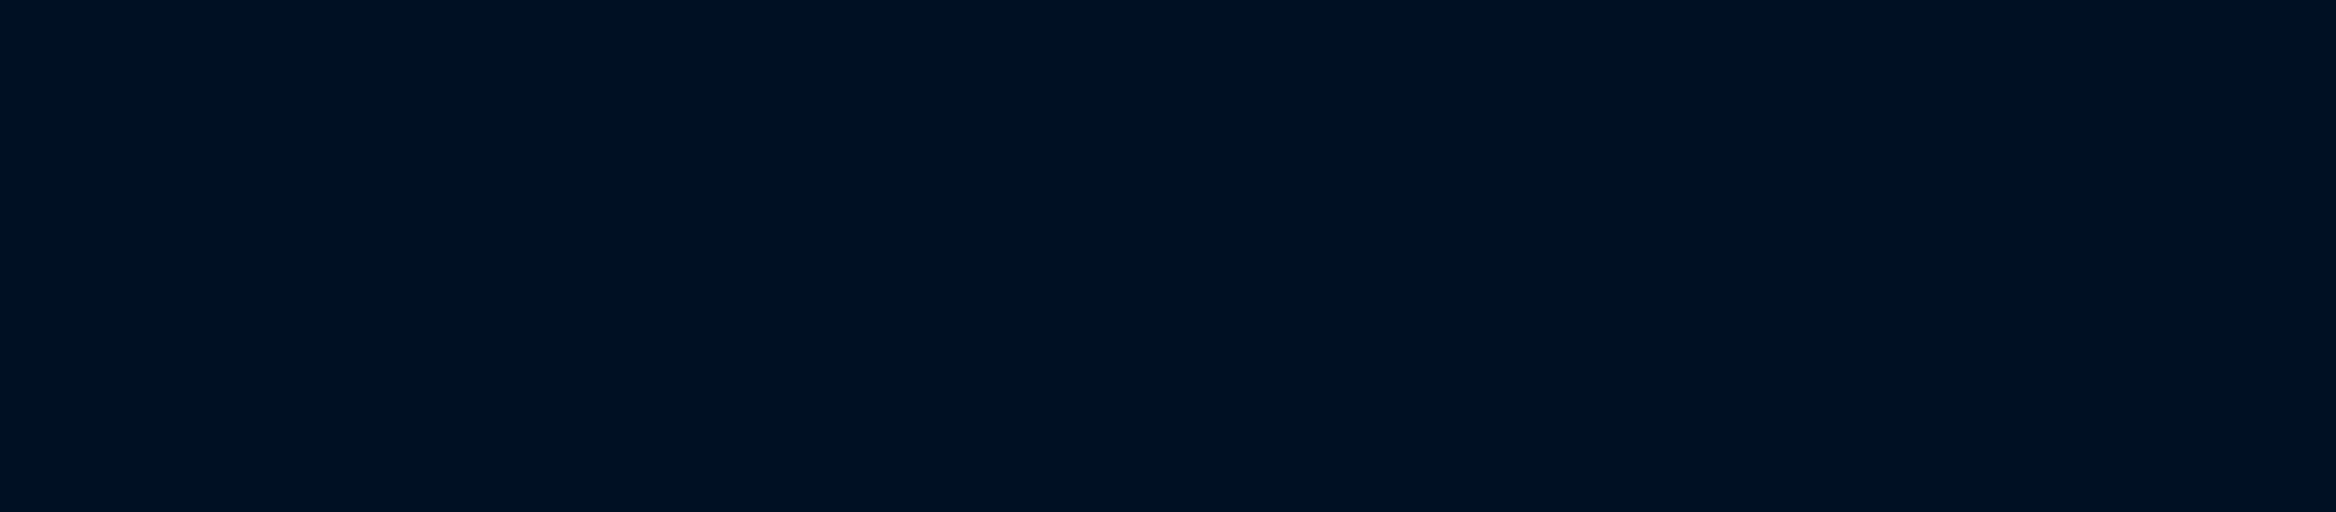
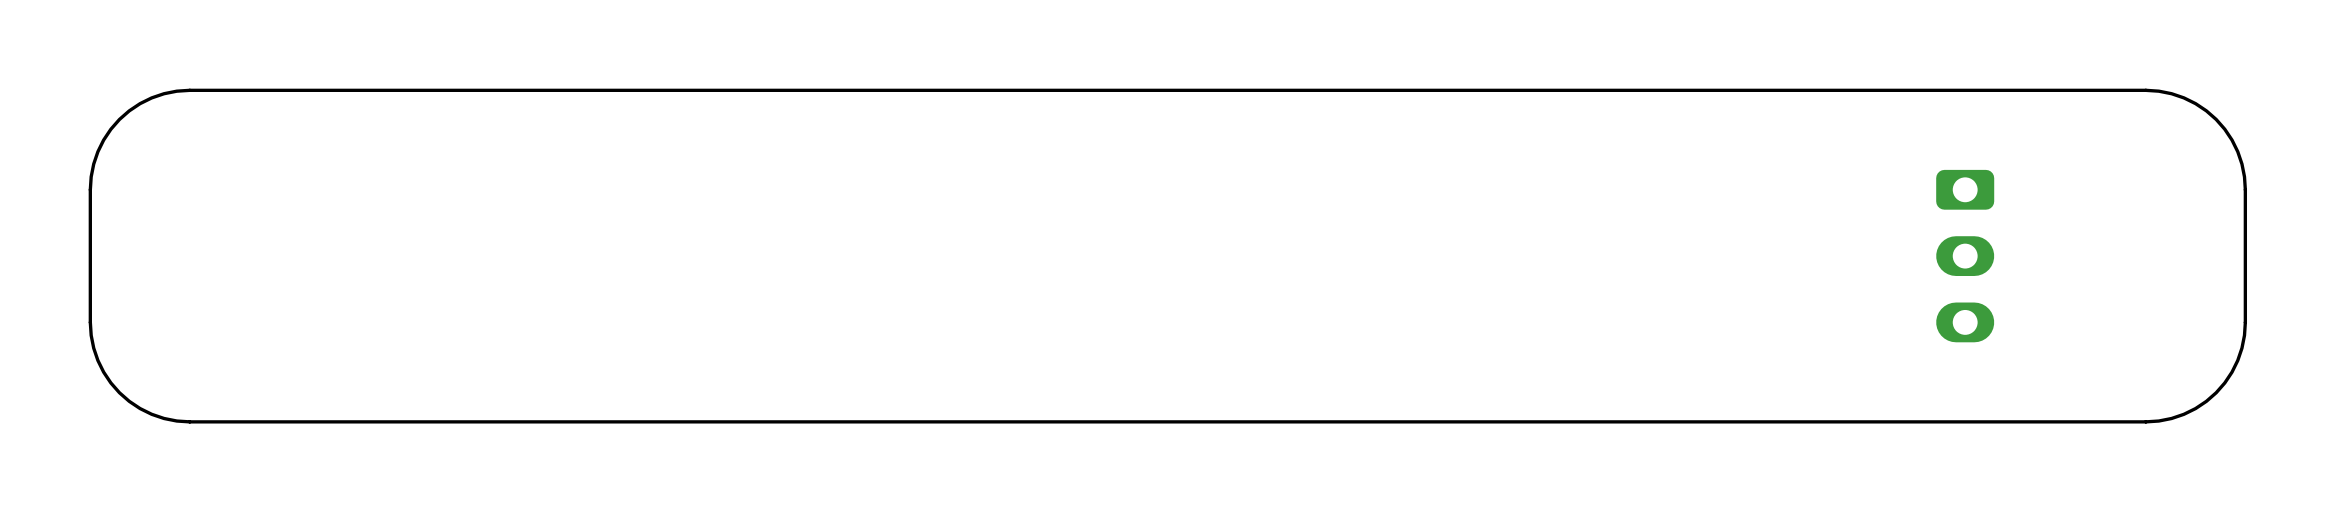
board edge: none -> (2145, 90) (176, 91) (151, 97) (129, 110) (110, 129) (97, 151) (93, 164) (90, 189) (91, 335) (97, 360) (103, 372) (110, 382) (129, 401) (151, 414) (164, 418) (189, 421) (2158, 421) (2183, 414) (2206, 401) (2224, 382) (2237, 360) (2244, 335) (2245, 322) (2245, 189) (2244, 176) (2237, 151) (2232, 140) (2216, 119) (2206, 110) (2183, 97) (2171, 93) (2145, 90)
part: none -> (1965, 256)

